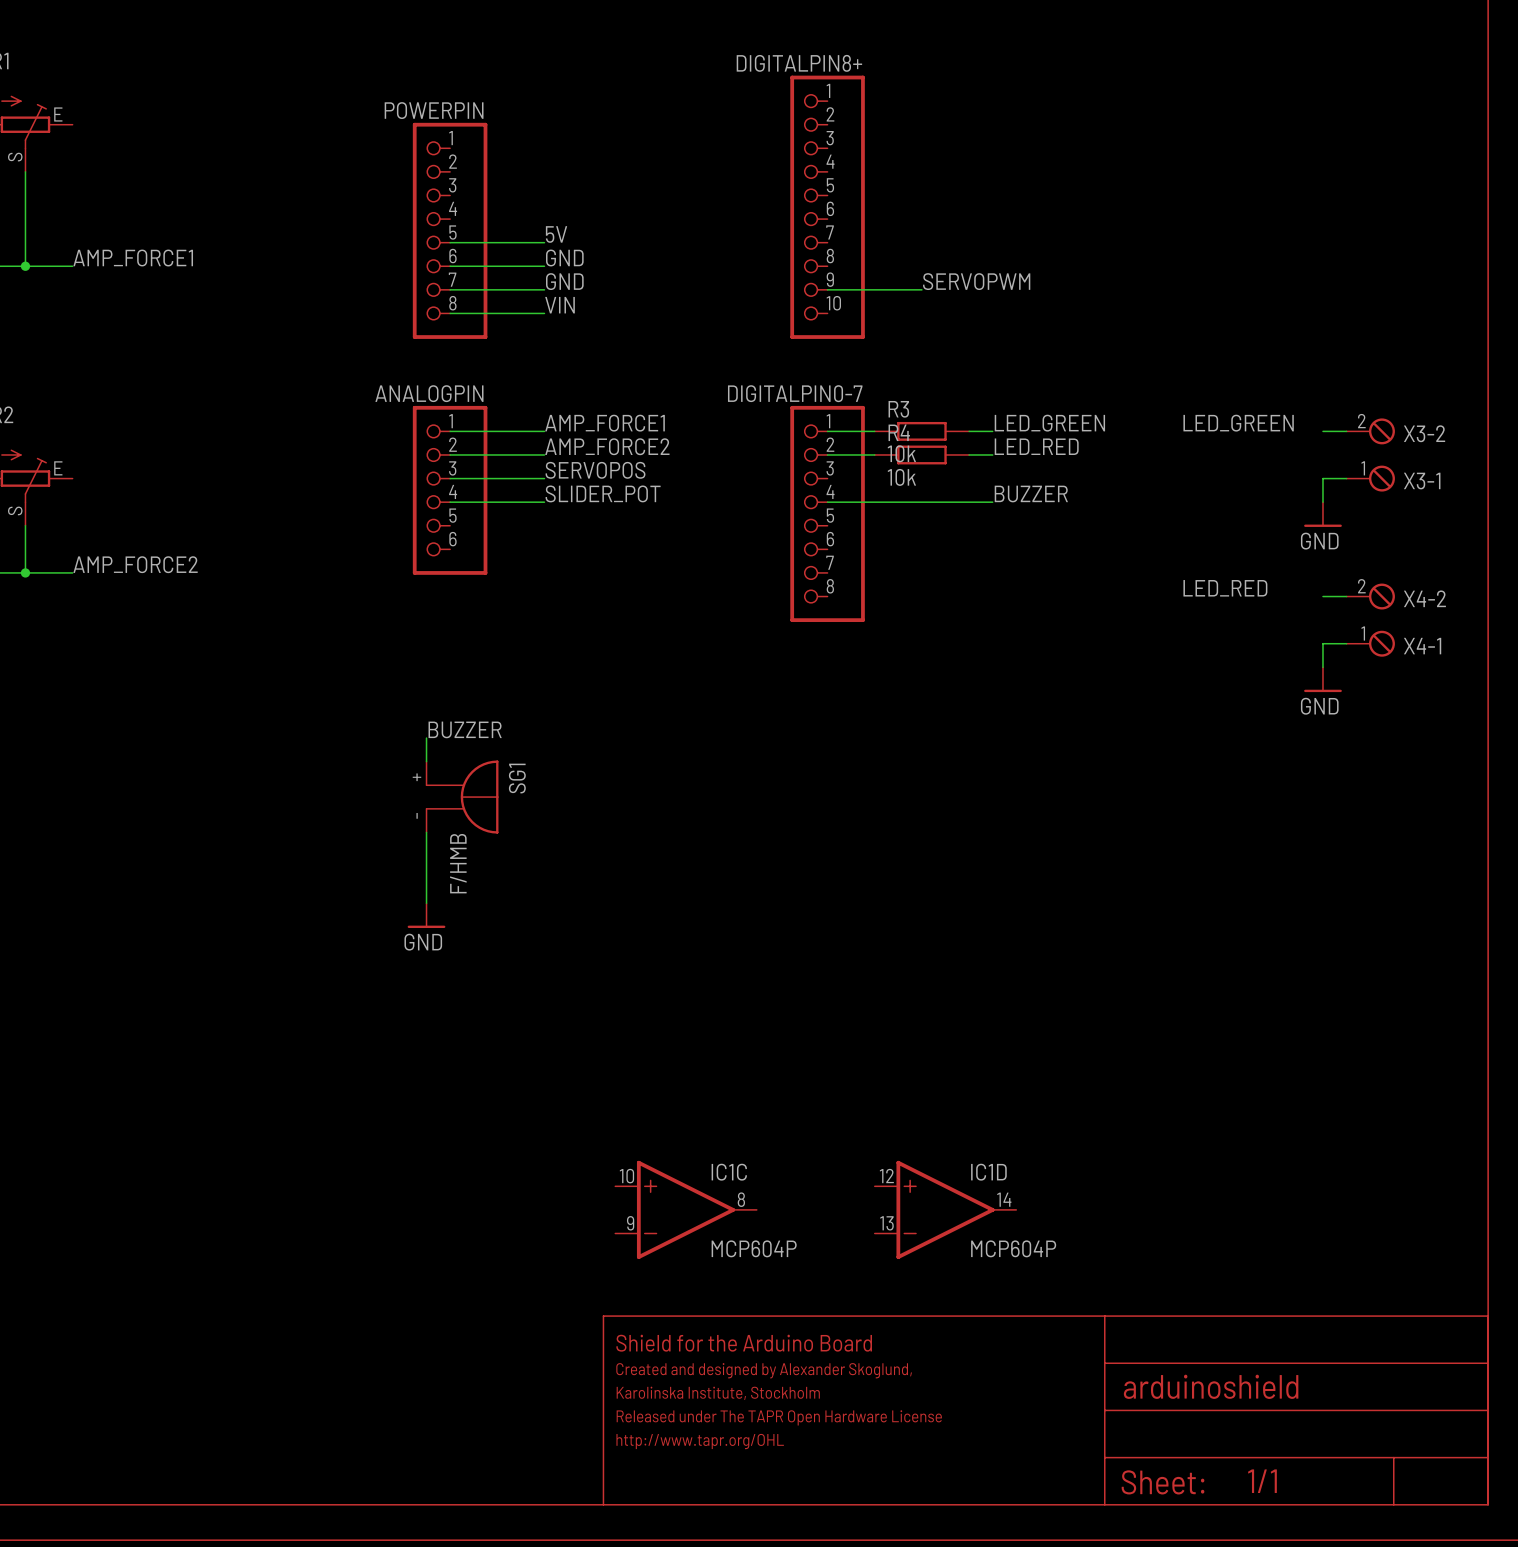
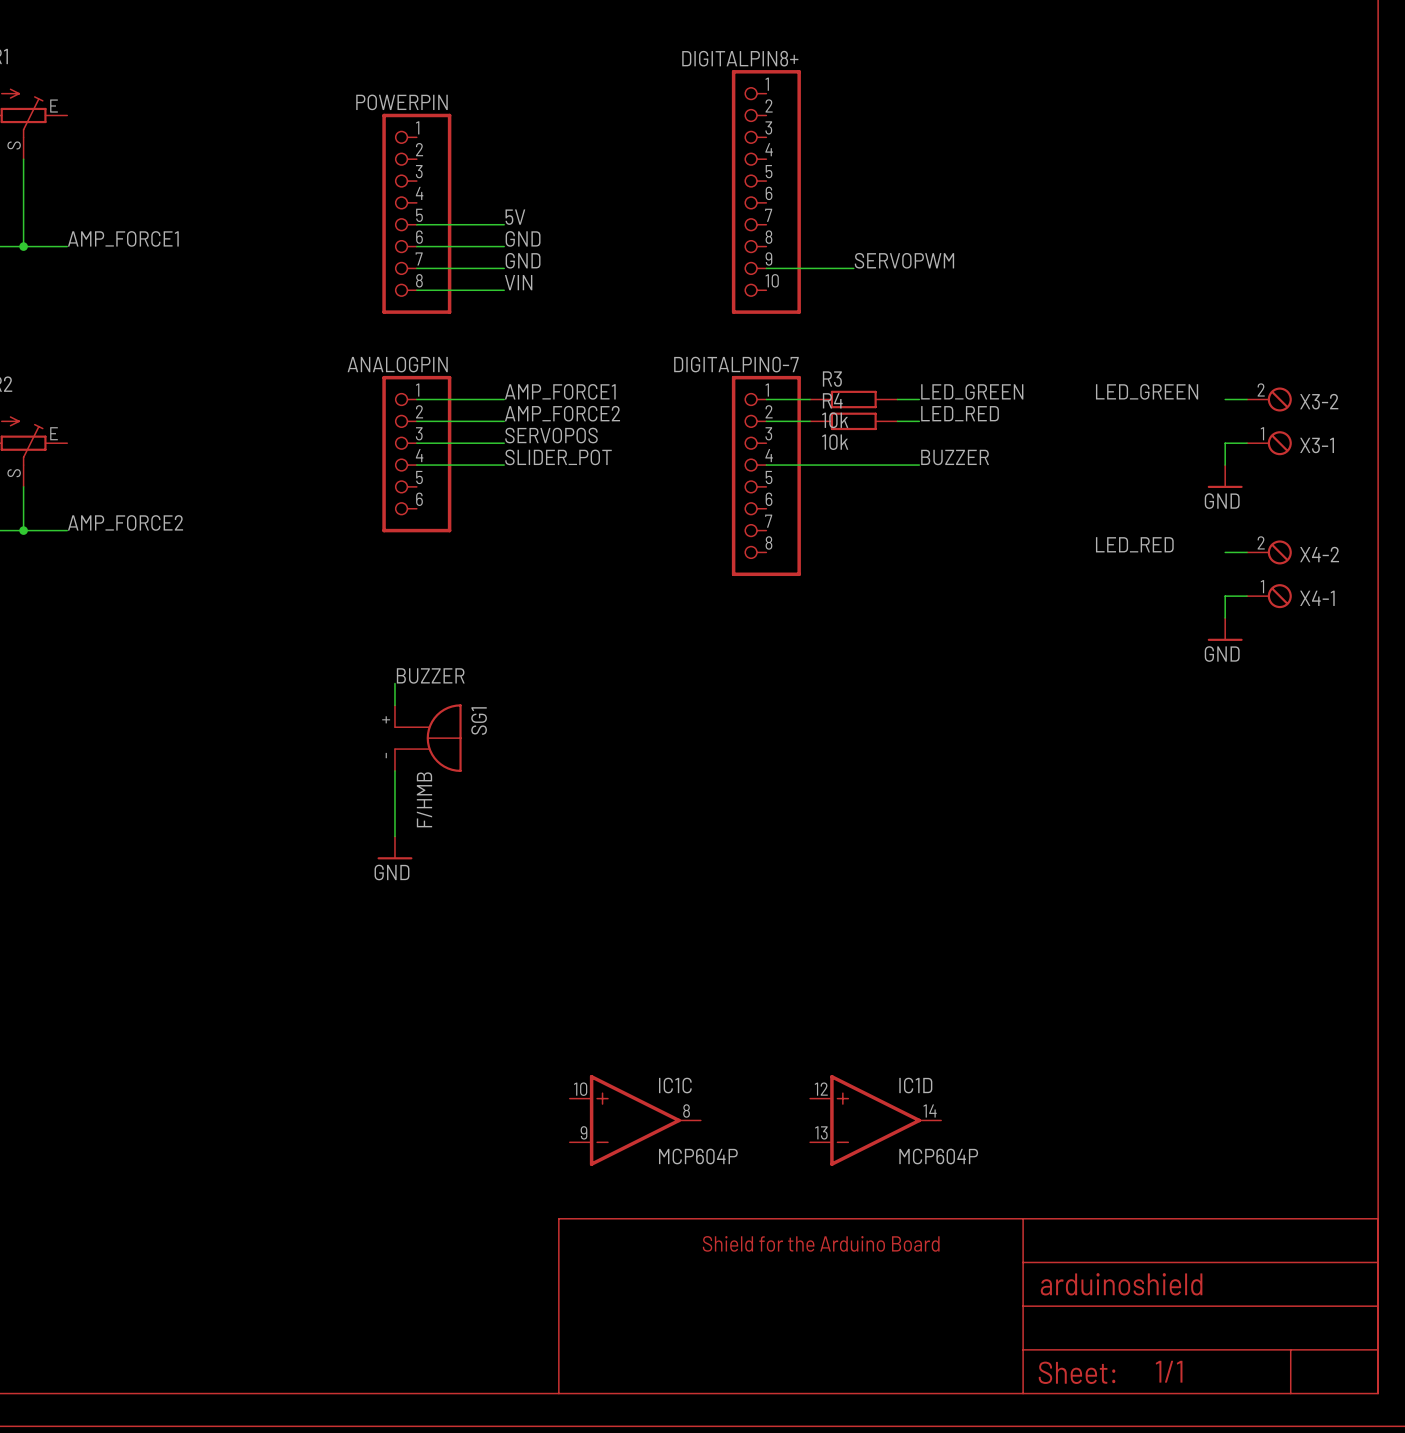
text: Shield for the Arduino Board (744, 1343) -> none
text: none -> Shield for the Arduino Board (821, 1243)
text: Created and designed by Alexander Skoglund, (764, 1370) -> none
text: Karolinska Institute, Stockholm (718, 1393) -> none
text: Released under The TAPR Open Hardware License (779, 1417) -> none
text: http://www.tapr.org/OHL (700, 1441) -> none

